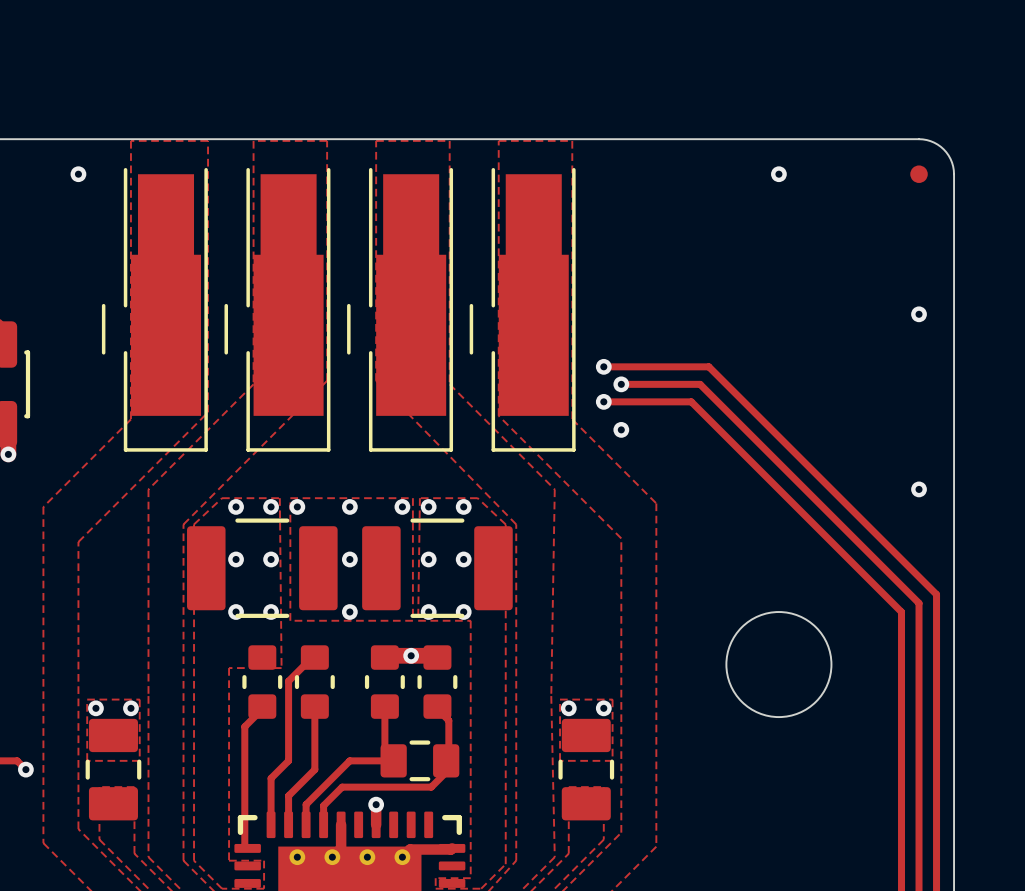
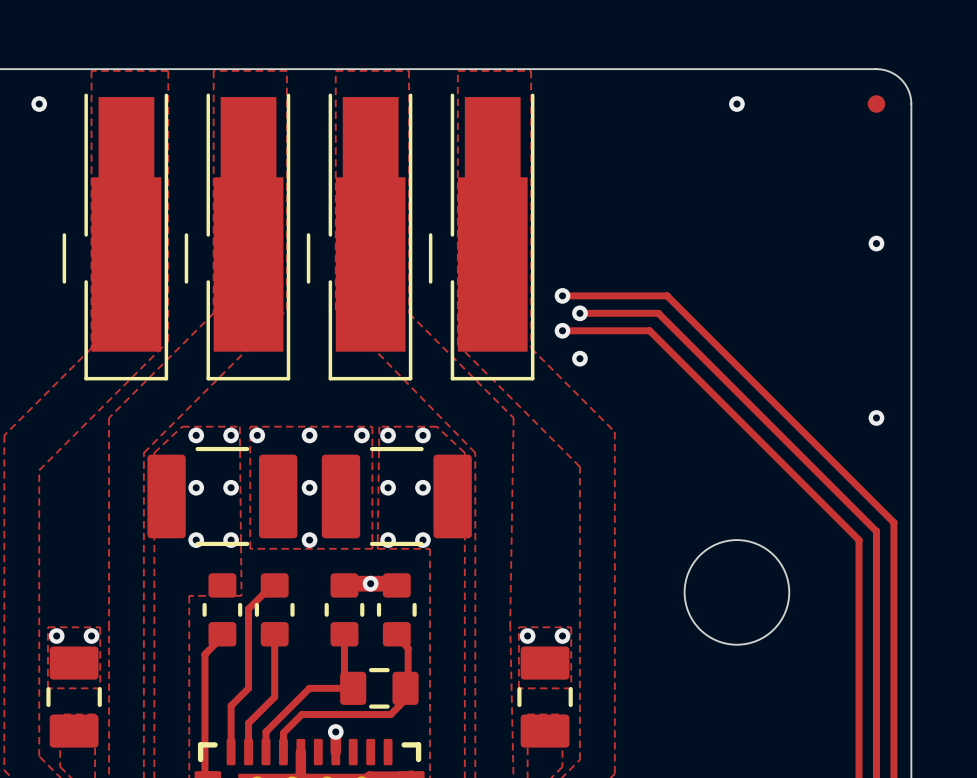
part footprint: [101, 168, 208, 452] -> [62, 93, 169, 381]
part footprint: [224, 168, 331, 452] -> [184, 93, 291, 381]
part footprint: [347, 168, 454, 452] -> [306, 93, 413, 381]
part footprint: [469, 168, 576, 452] -> [428, 93, 535, 381]

